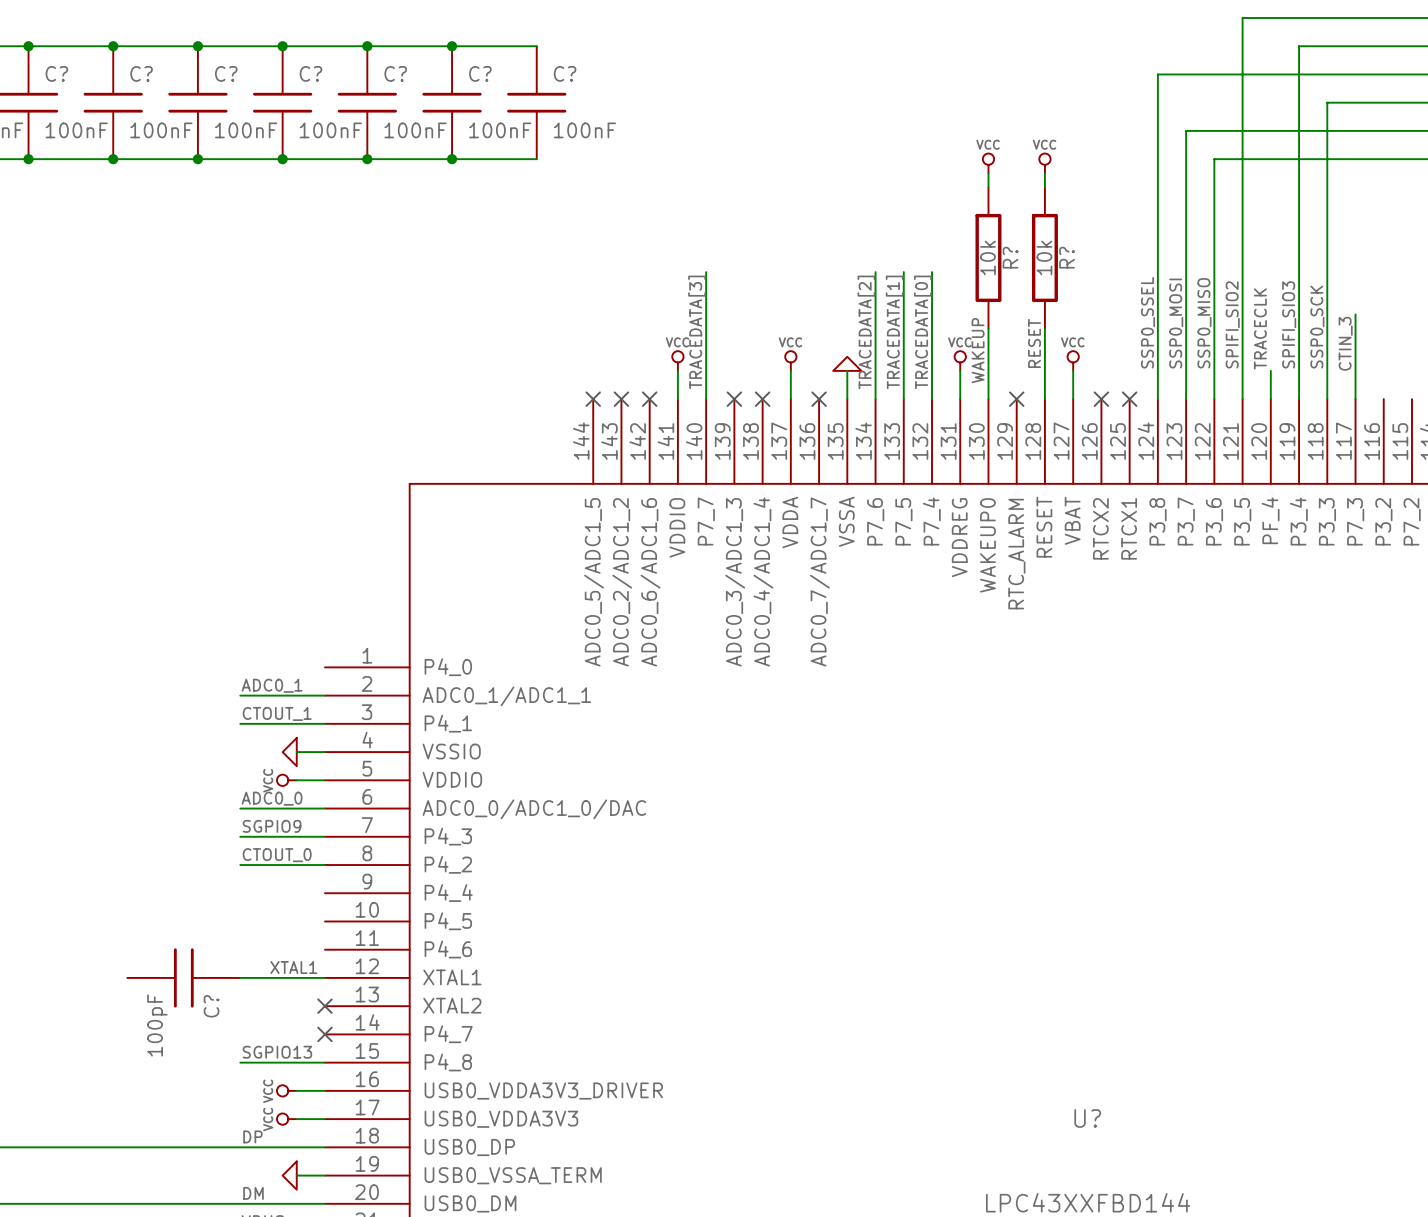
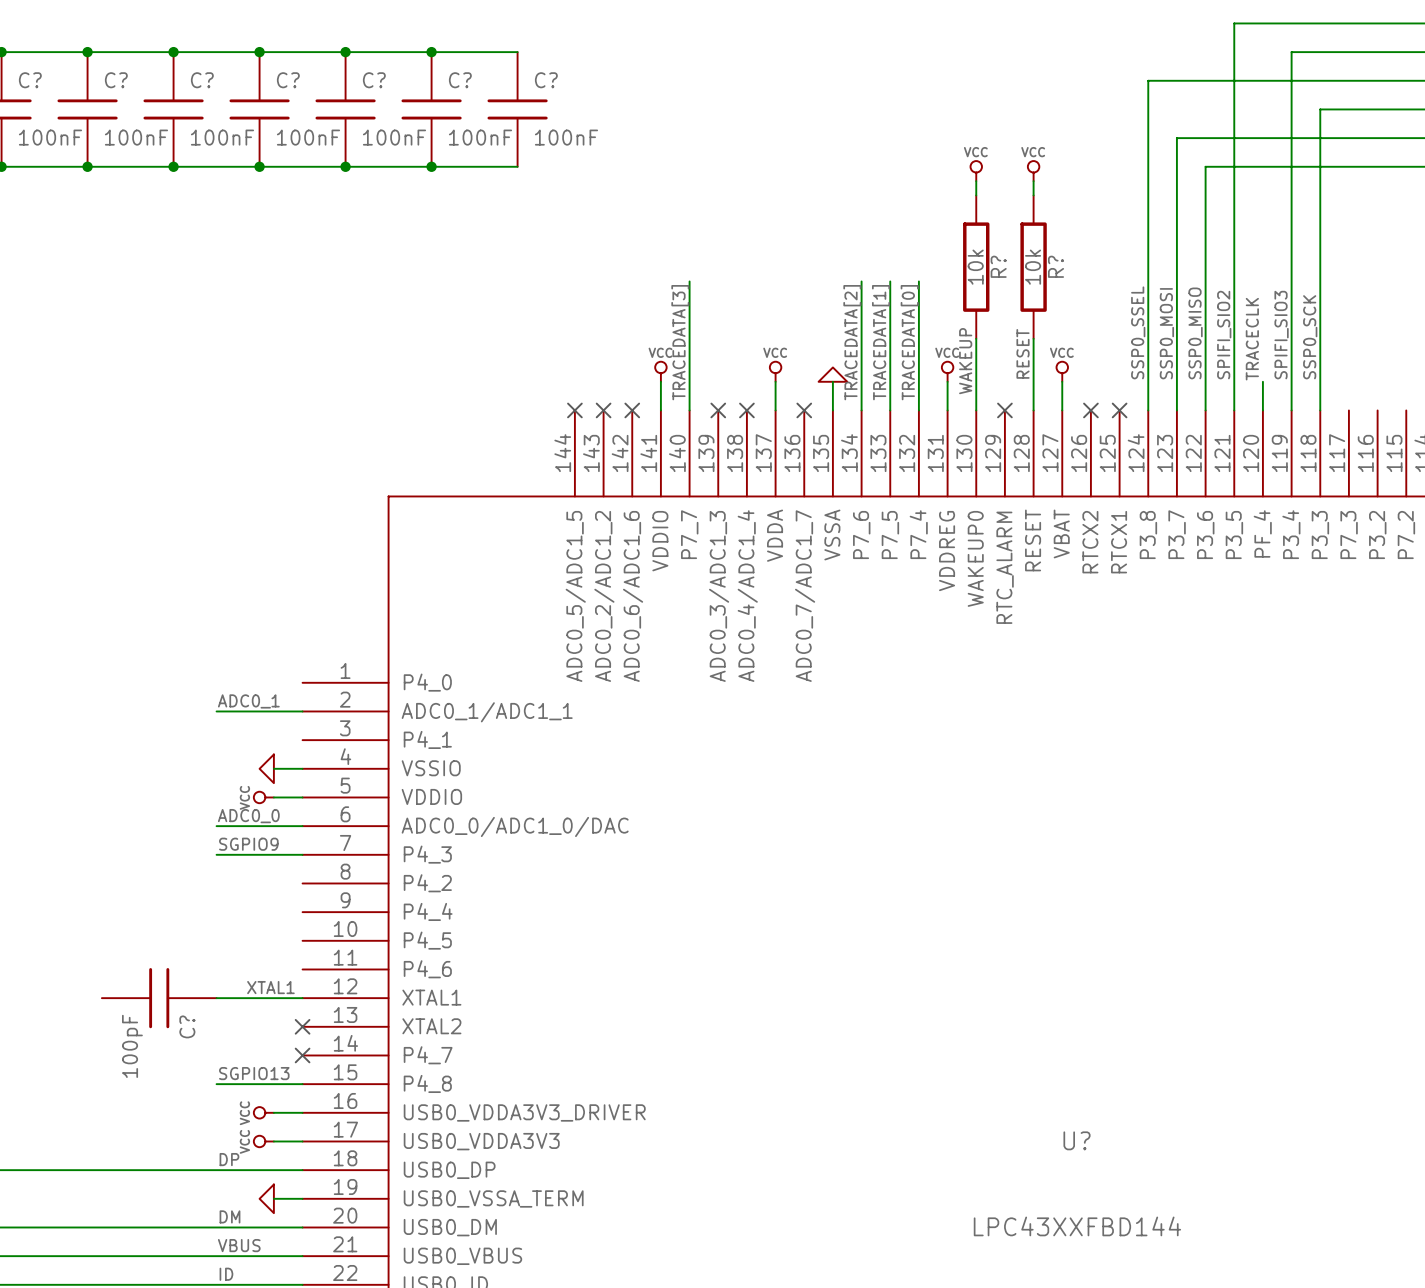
wire: (1355, 314) (1355, 399) -> none
label: CTIN_3 (1345, 343) -> none
label: CTOUT_1 (277, 713) -> none
wire: (240, 723) (324, 723) -> none
label: CTOUT_0 (277, 855) -> none
wire: (240, 865) (324, 865) -> none

